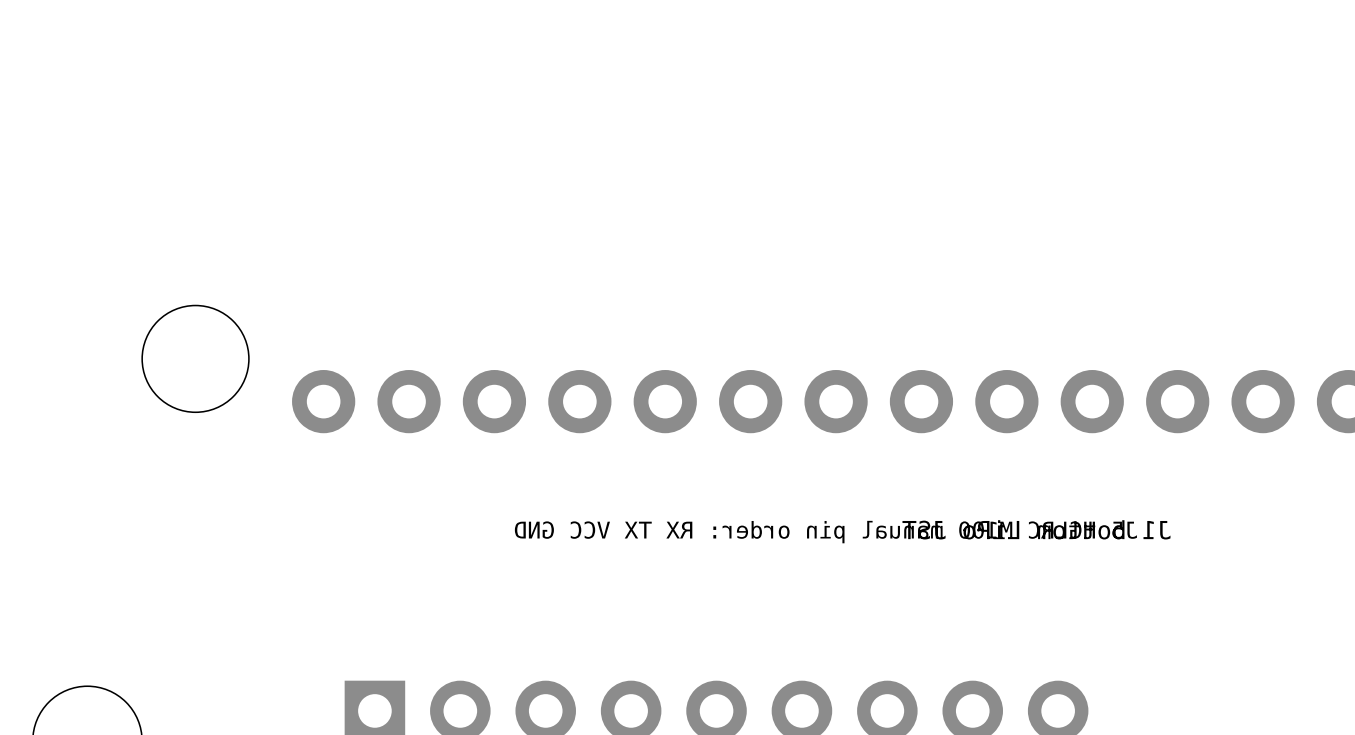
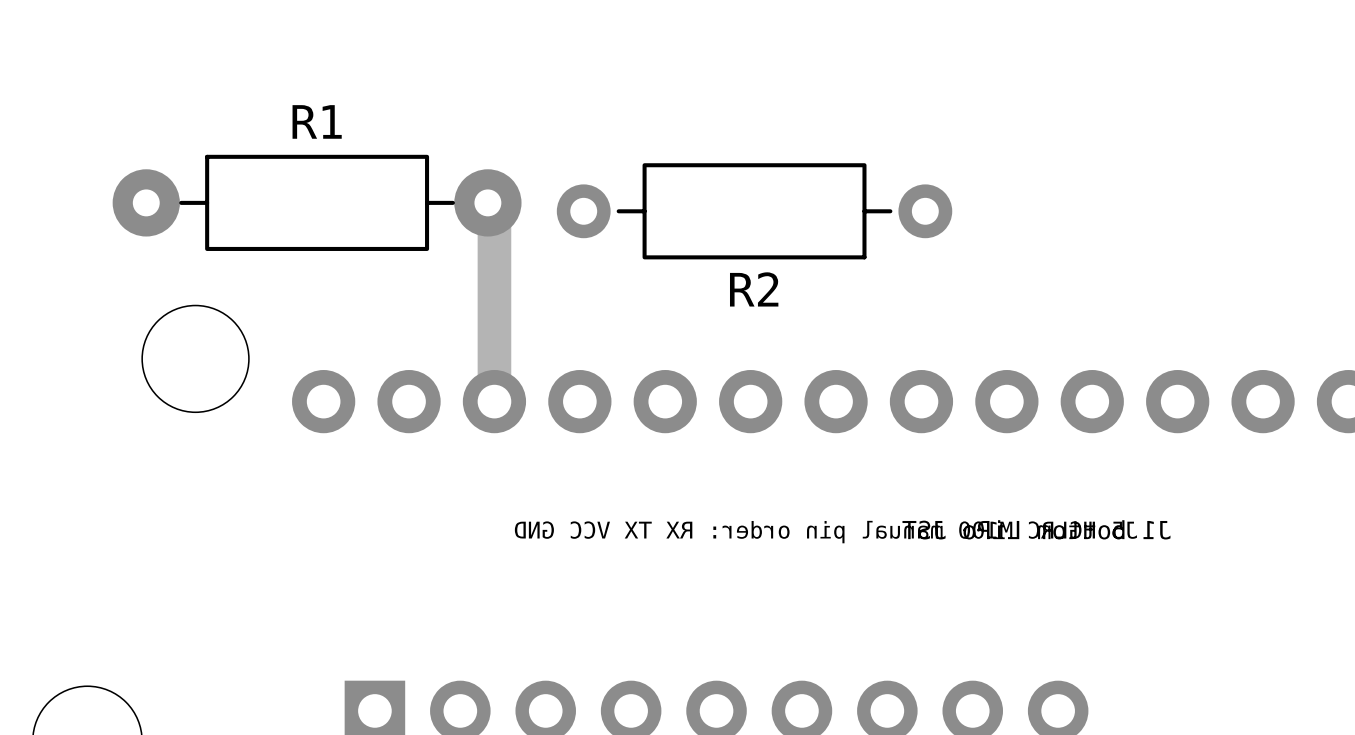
R1: none -> (317, 202)
track: none -> (487, 202) (494, 209) (494, 401) (490, 398)
R2: none -> (754, 211)

